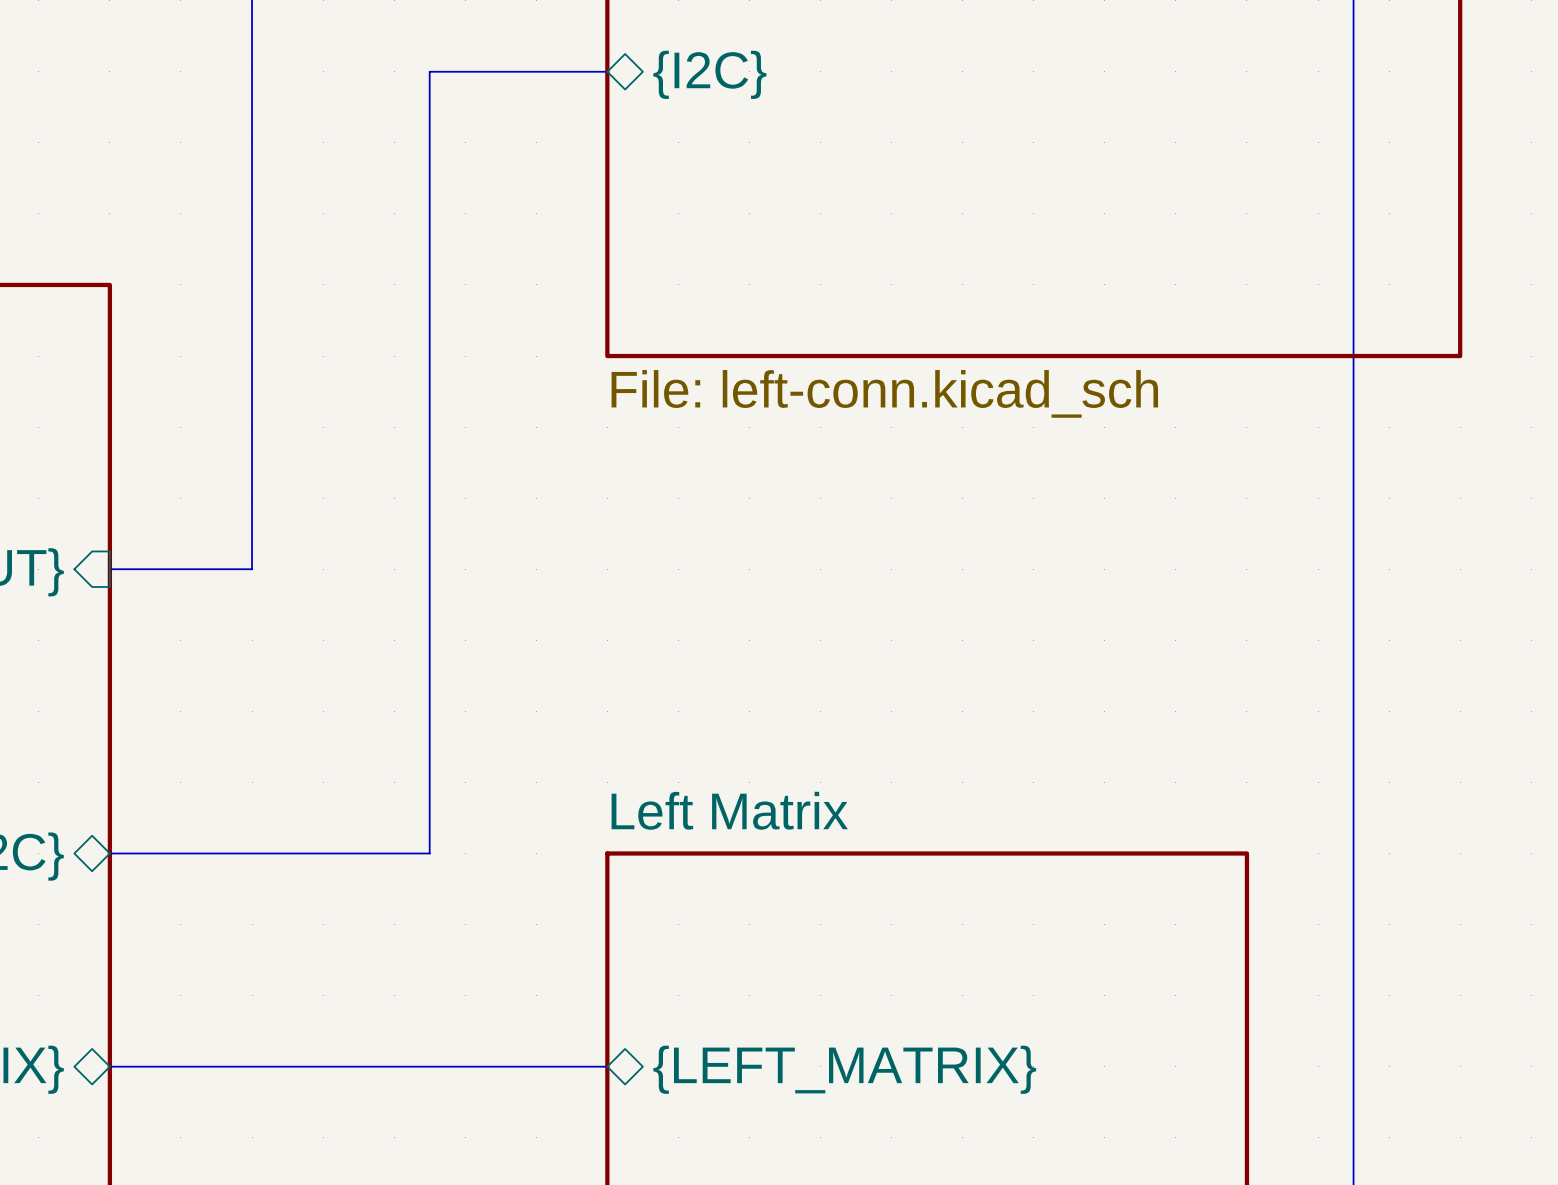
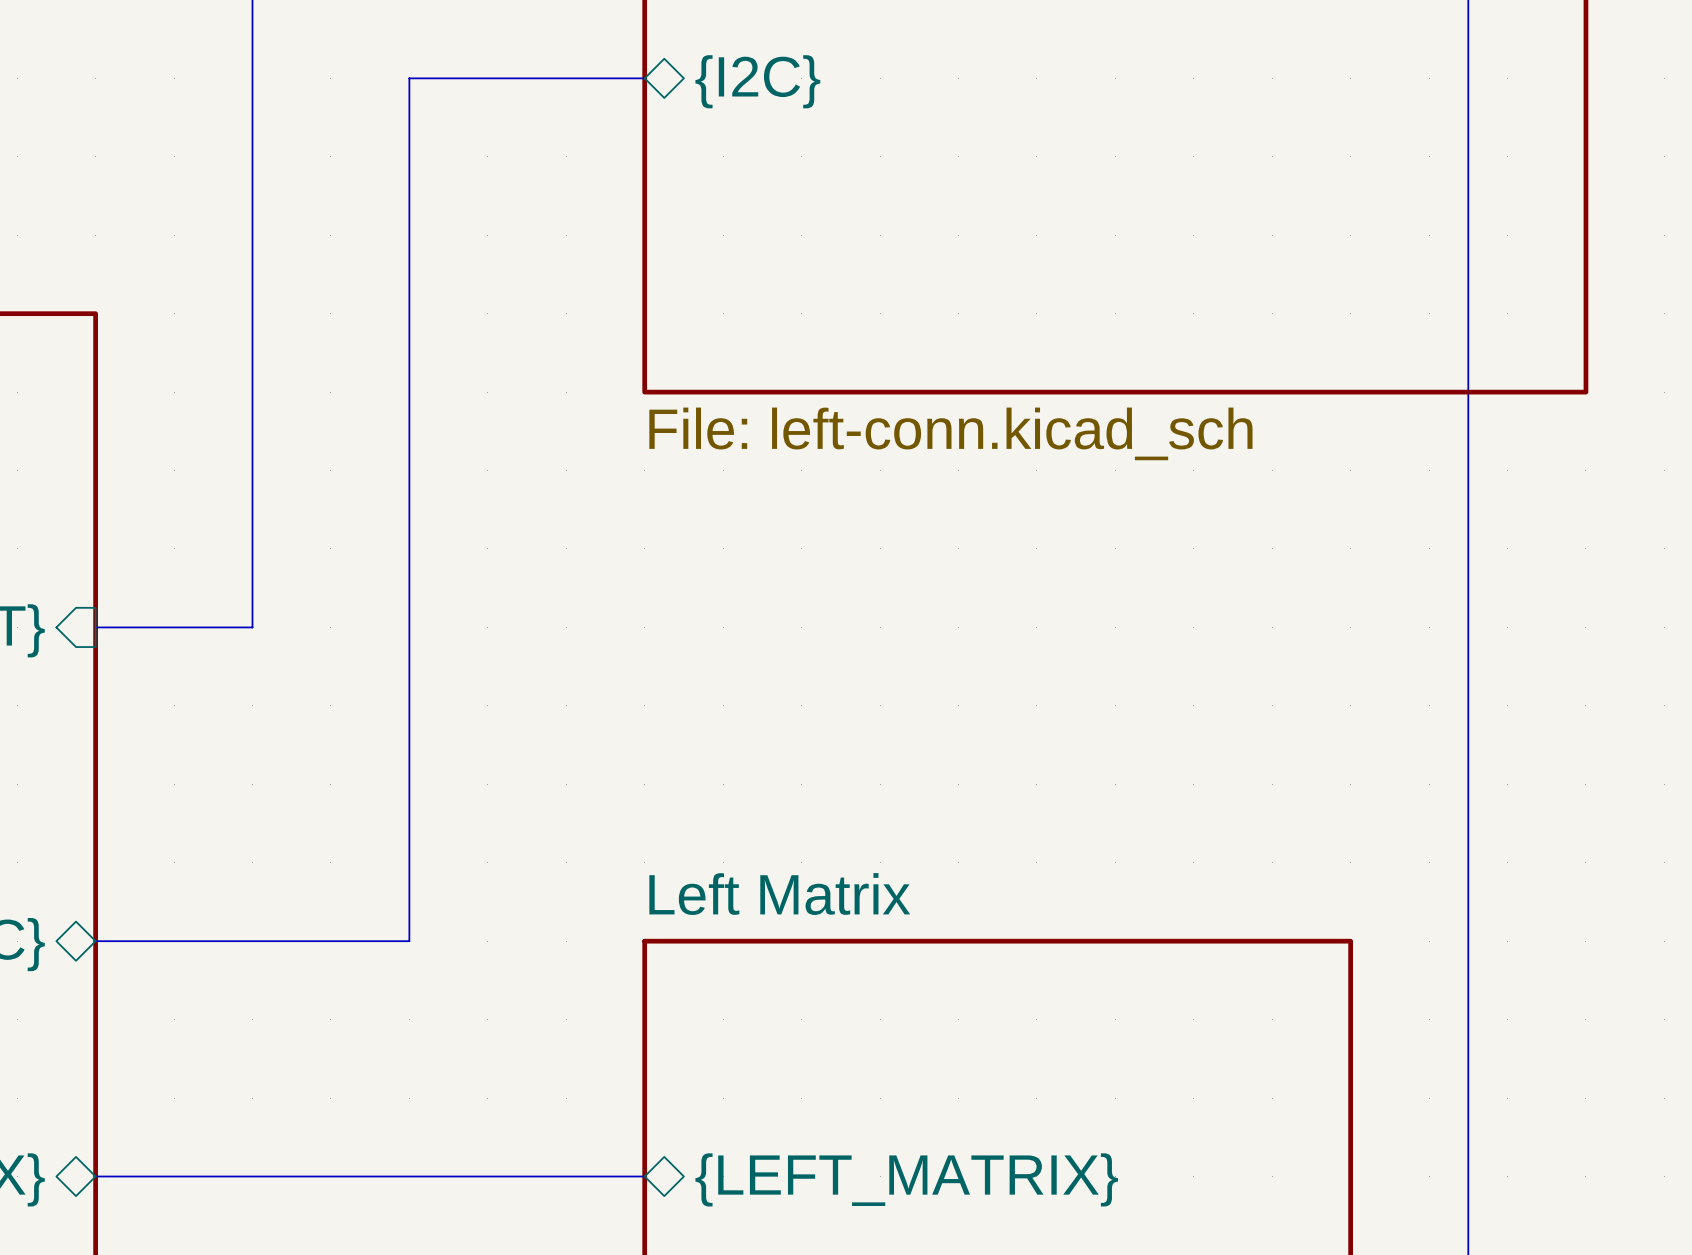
bus: (429, 71) (429, 853) (394, 853) -> (448, 78) (409, 78) (409, 941)

